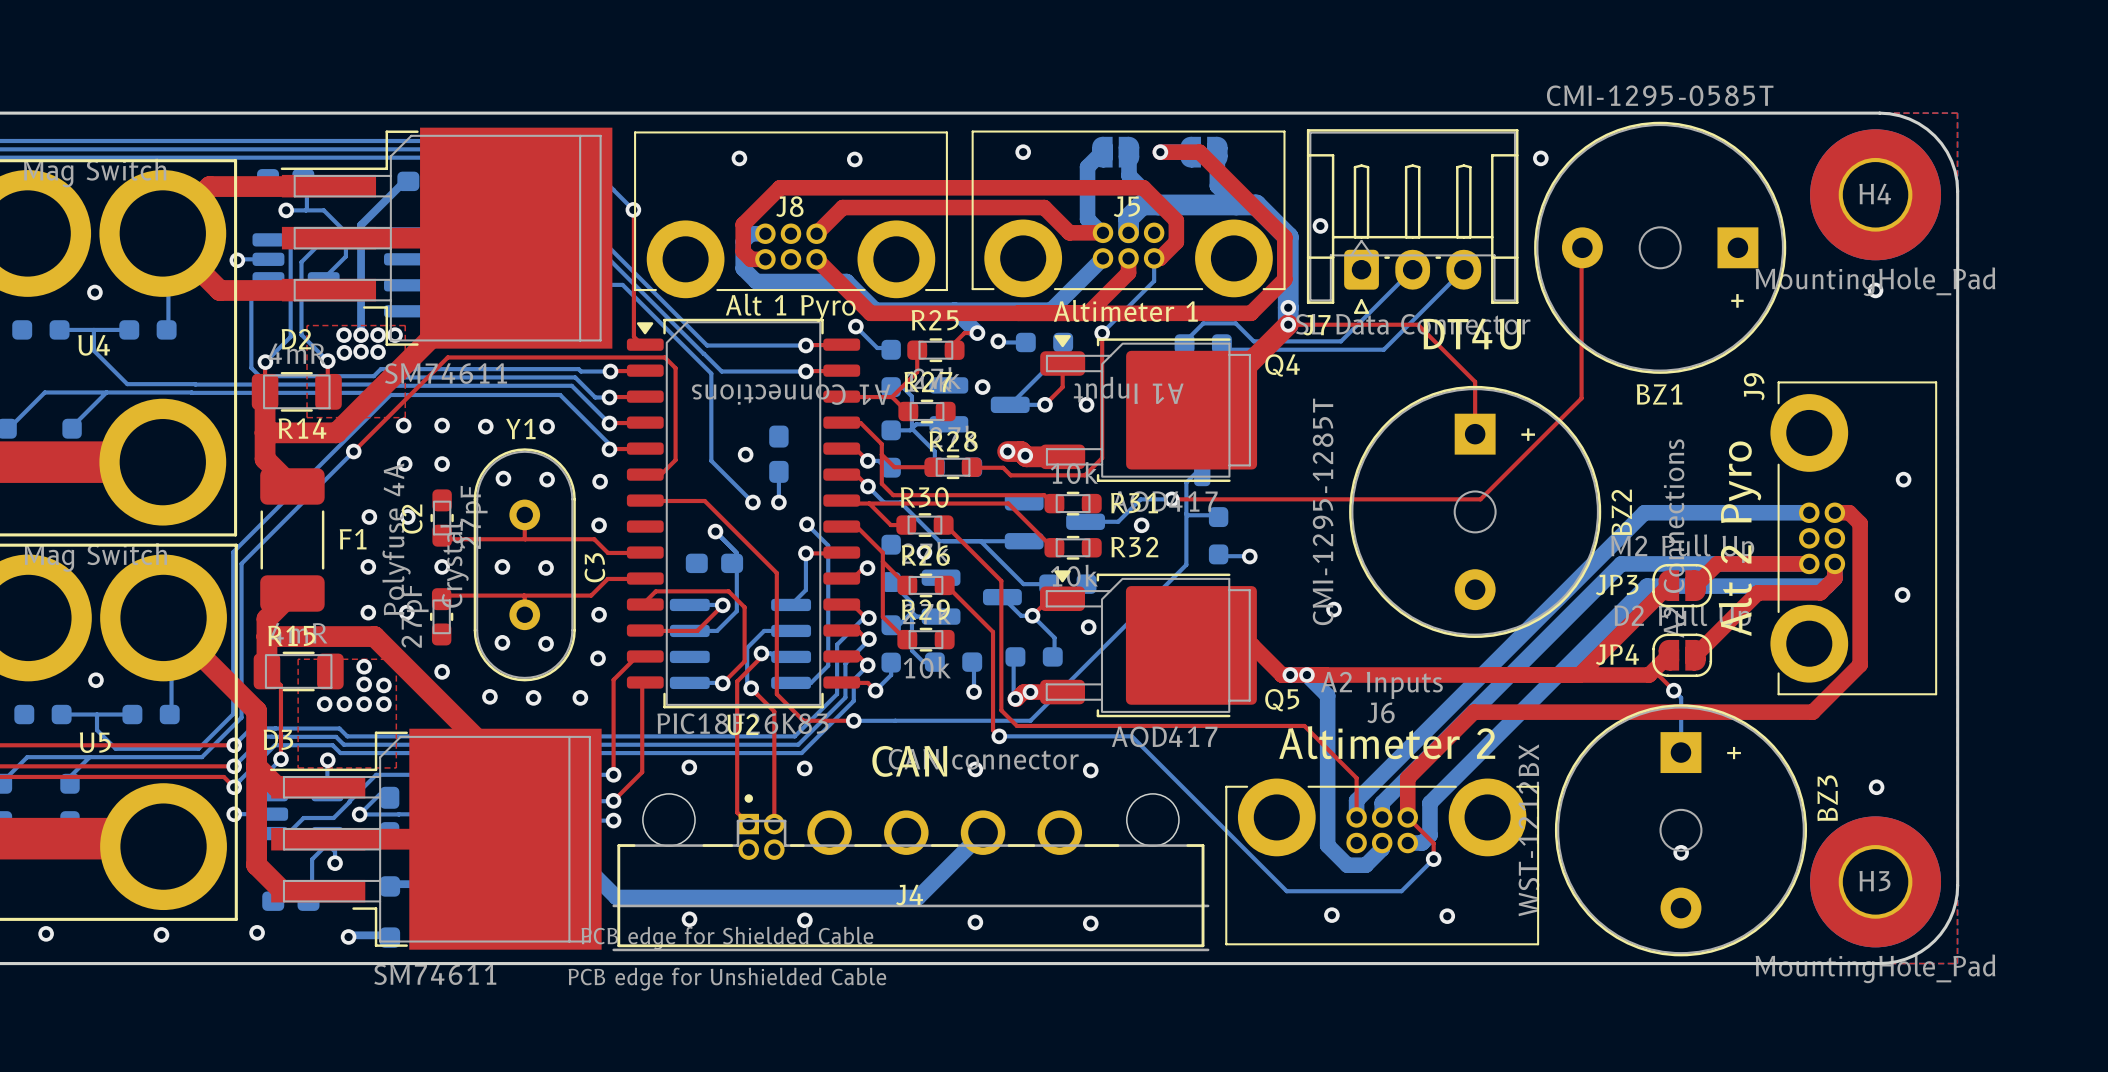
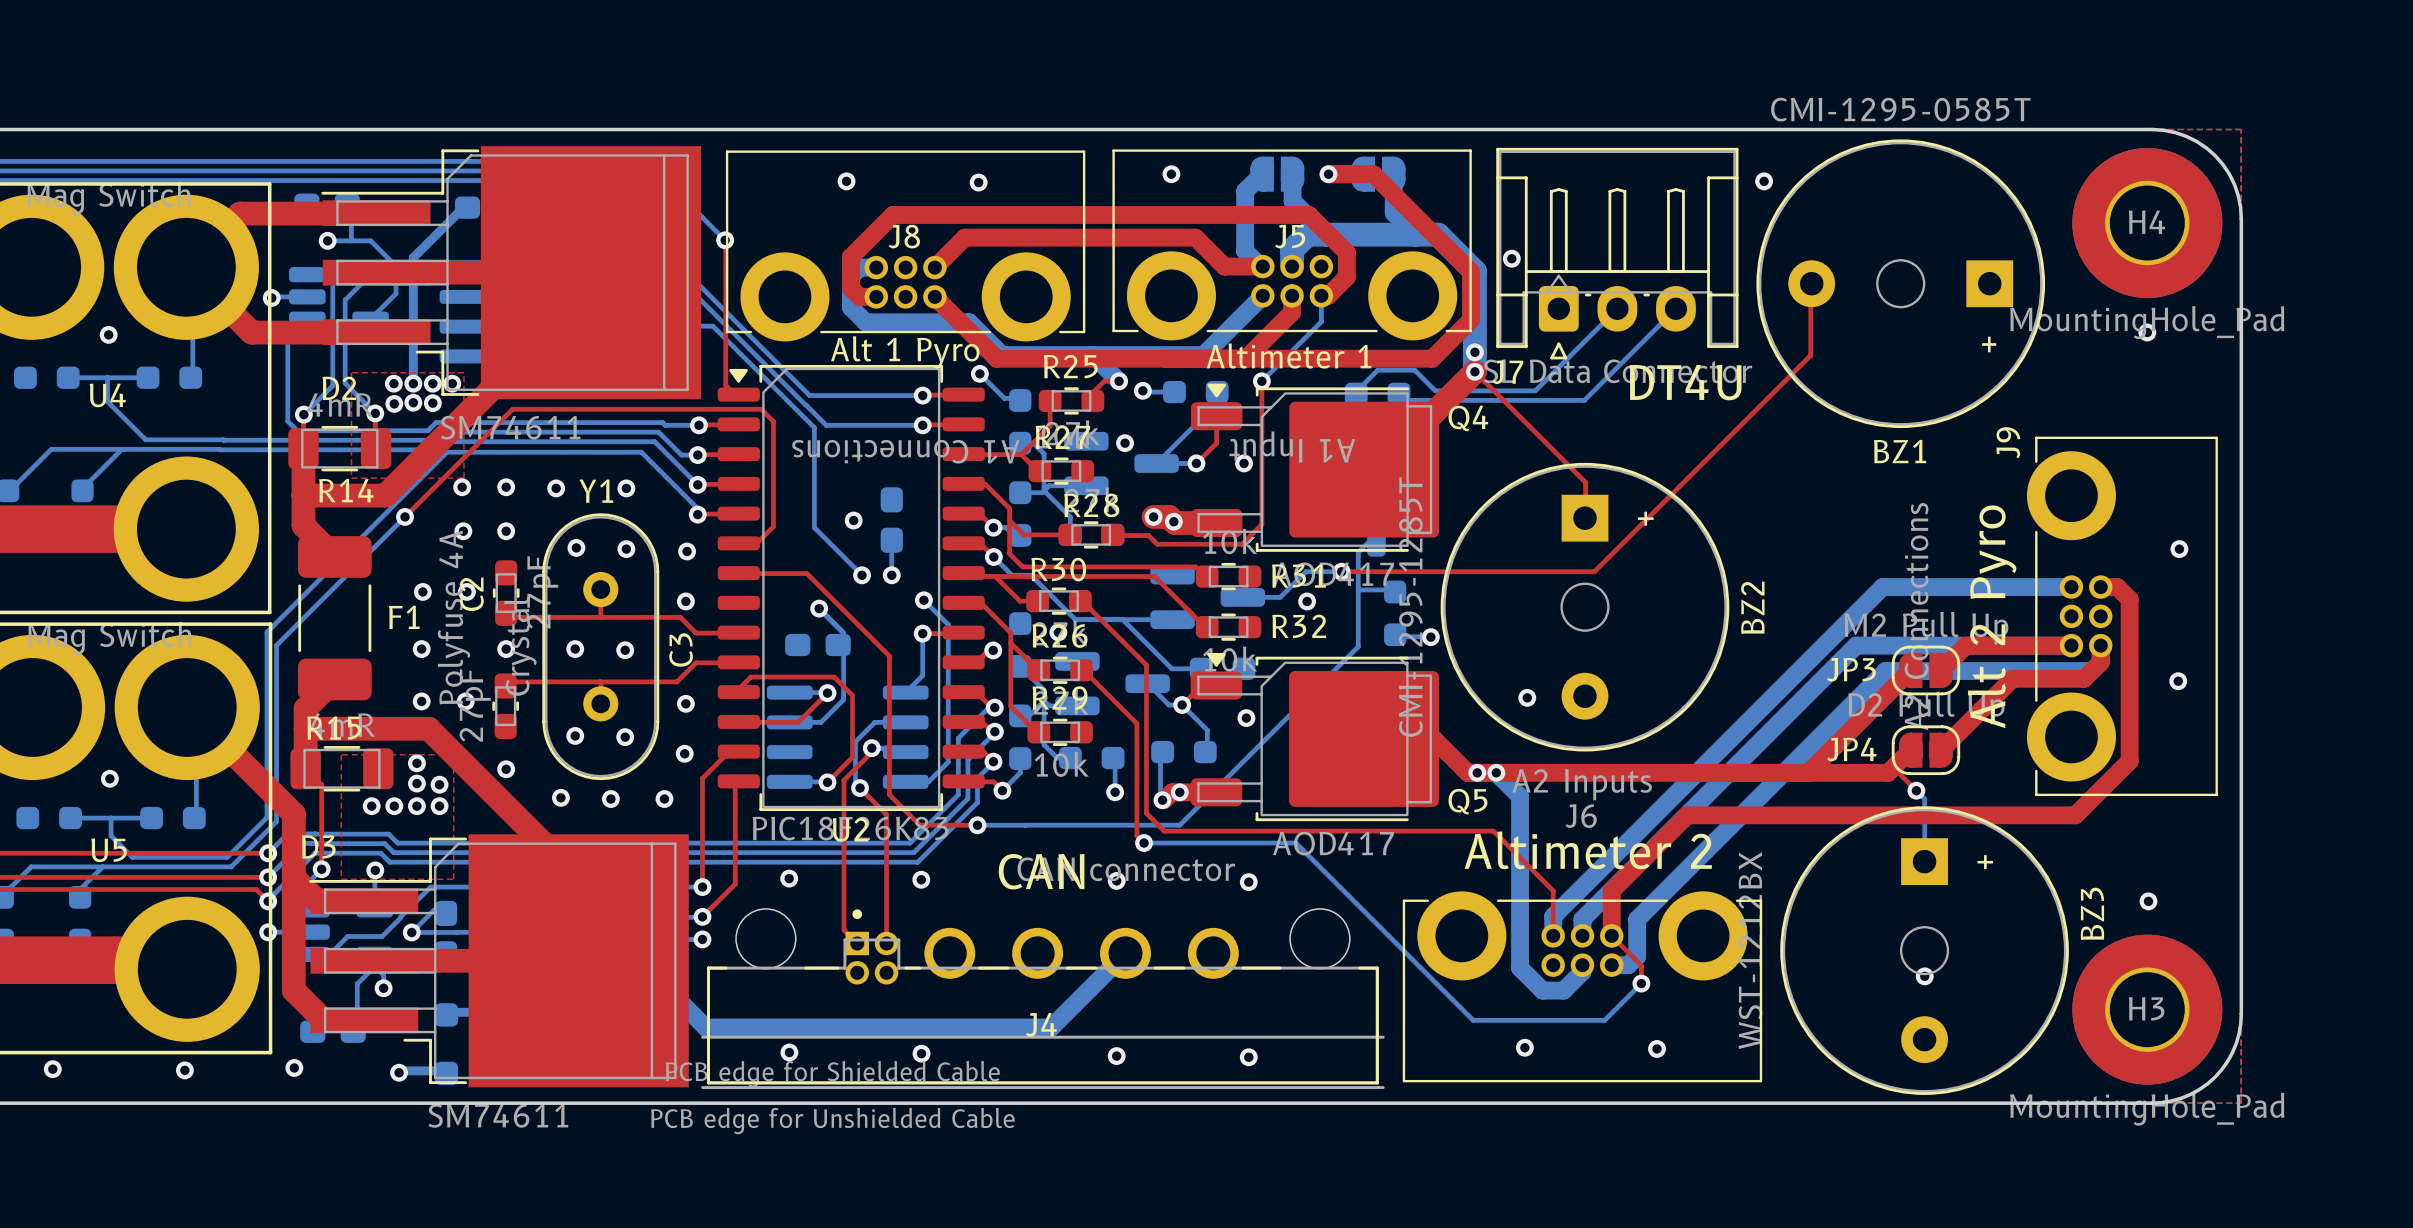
top track: (1581, 310) (1581, 398) (1480, 499) (1392, 499) -> (1810, 355) (1594, 571)
top track: (1288, 324) (1417, 324) (1475, 381) (1475, 434) -> (1474, 371) (1585, 482) (1585, 519)
BZ2 position: (1475, 511) -> (1584, 607)

